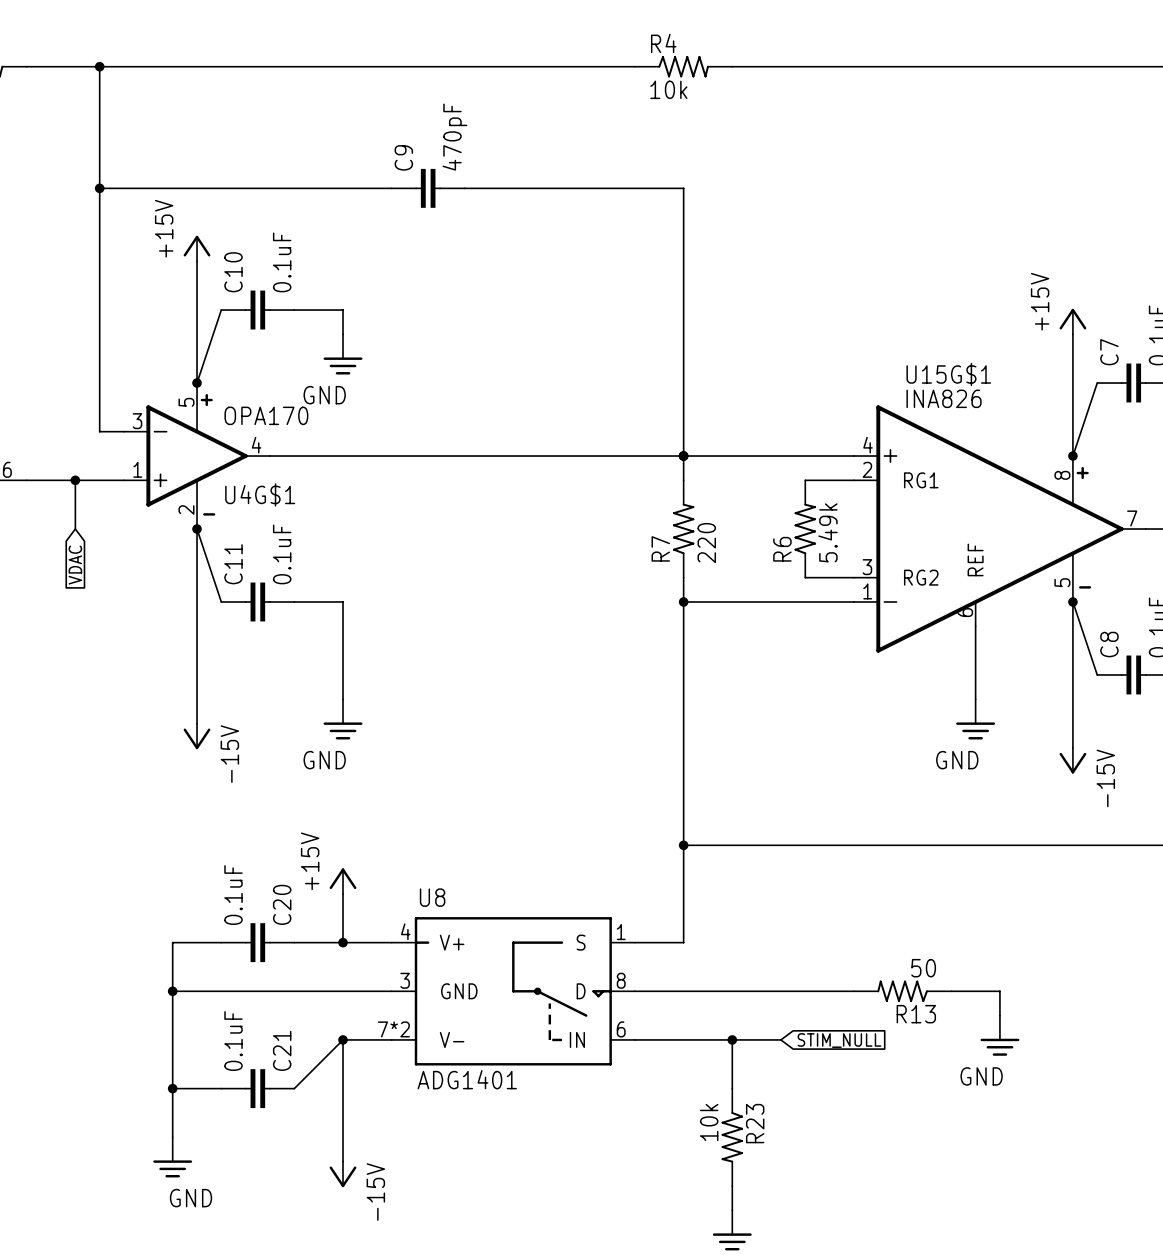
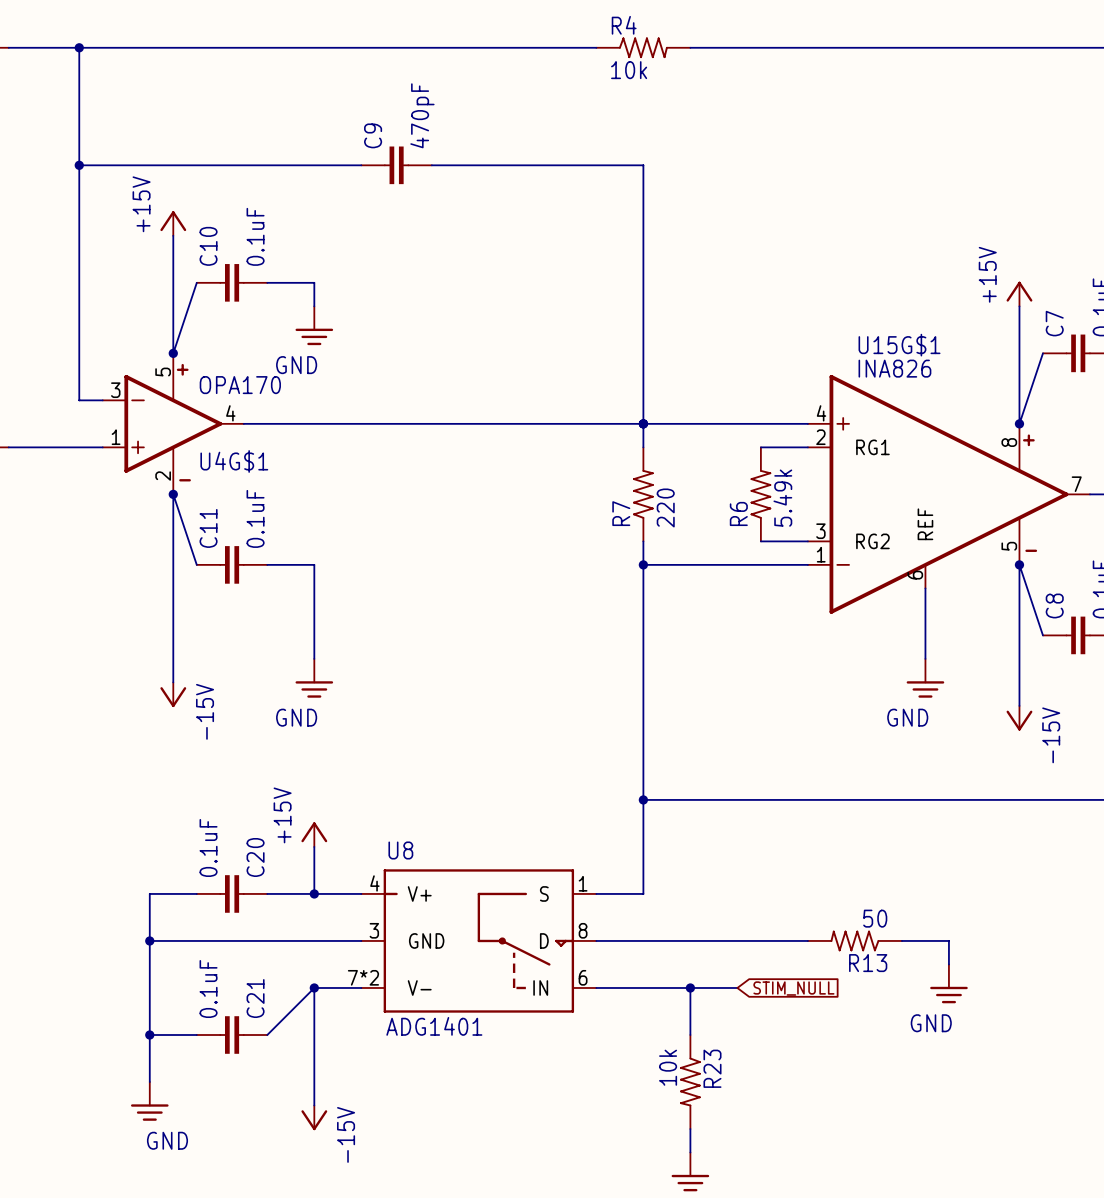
wire: (75, 480) (75, 529) -> none
junction: (75, 480) -> none
global label: VDAC (75, 565) -> none

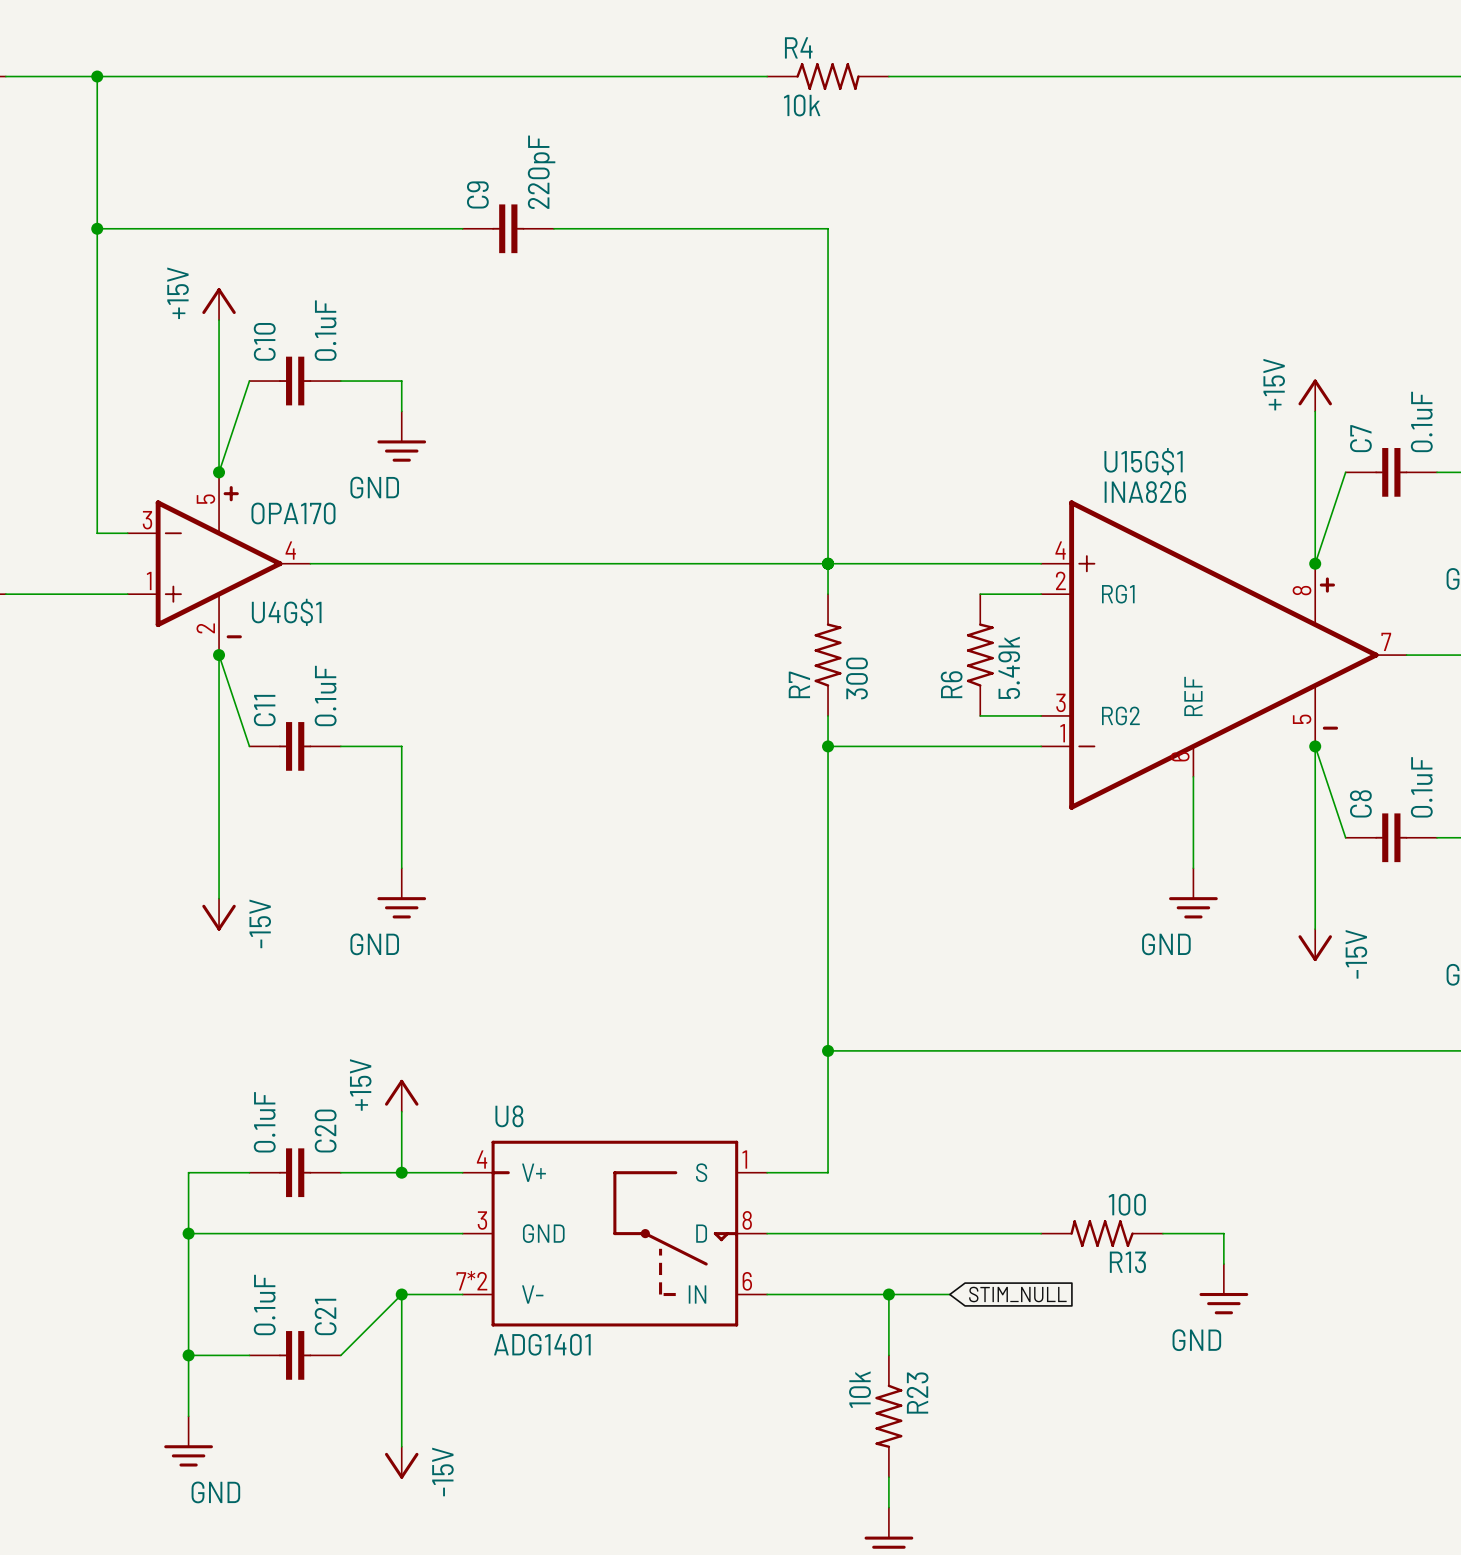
C9 value: 470pF (422, 115) -> 220pF (541, 172)
R7 value: 220 (665, 507) -> 300 (856, 678)
R13 value: 50 (875, 918) -> 100 (1127, 1204)

